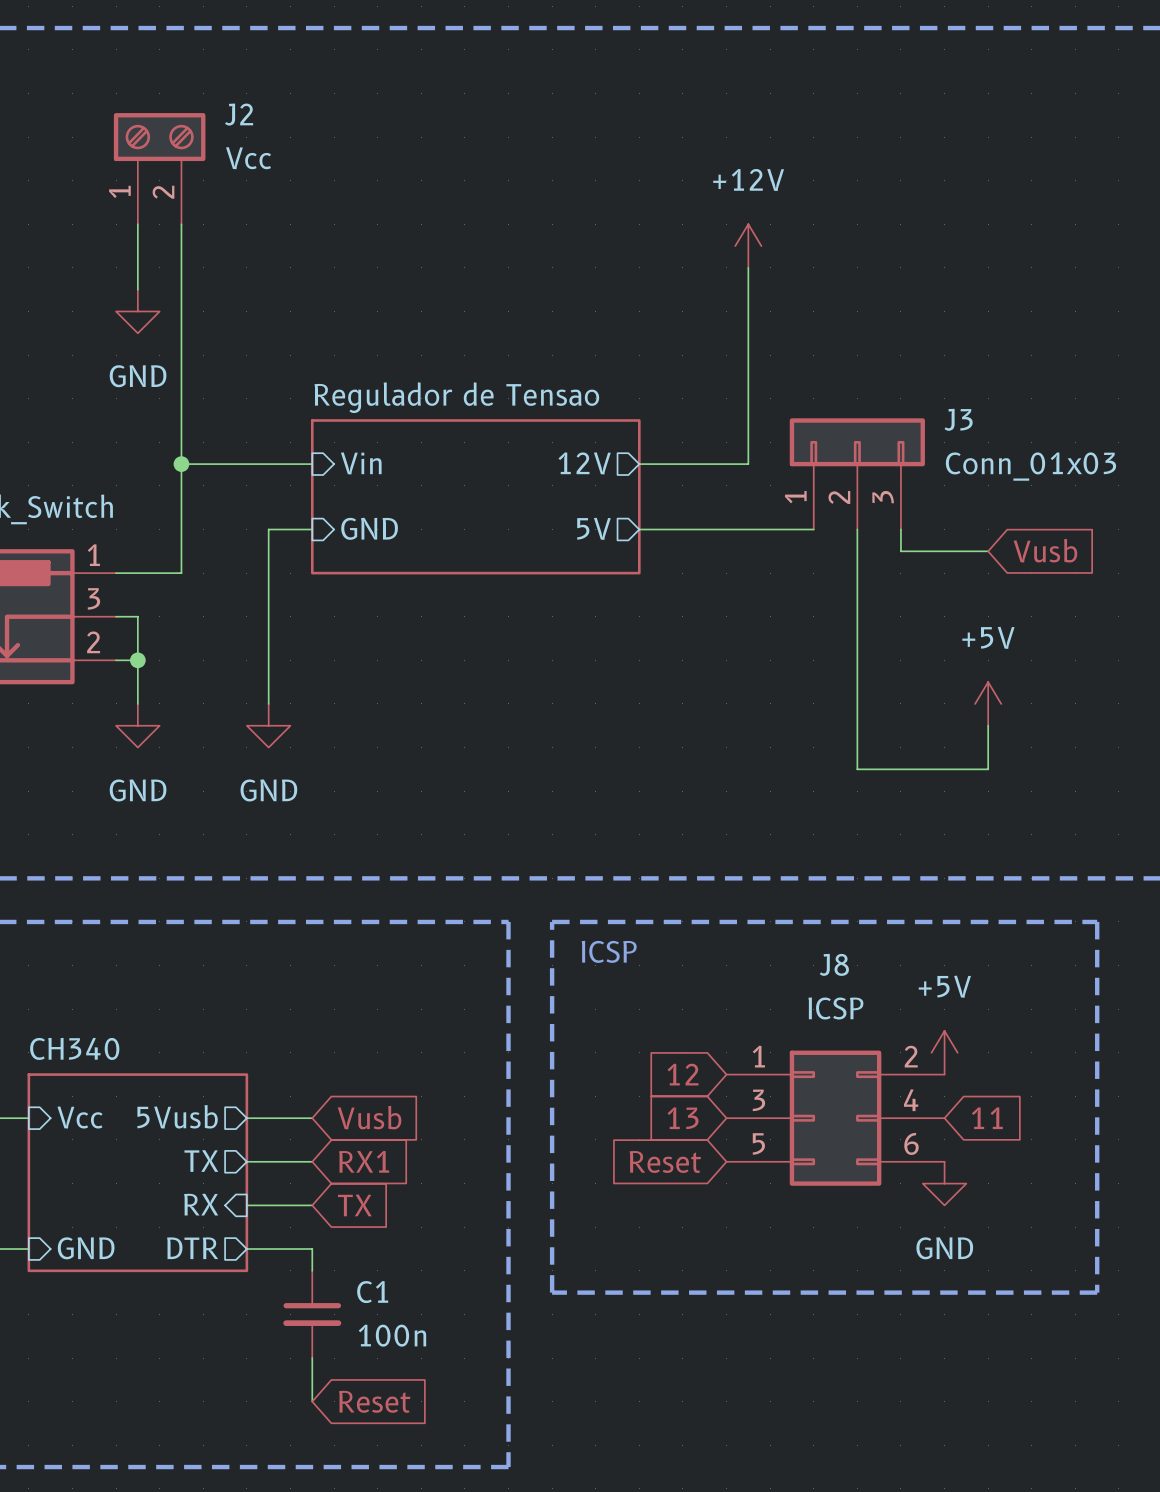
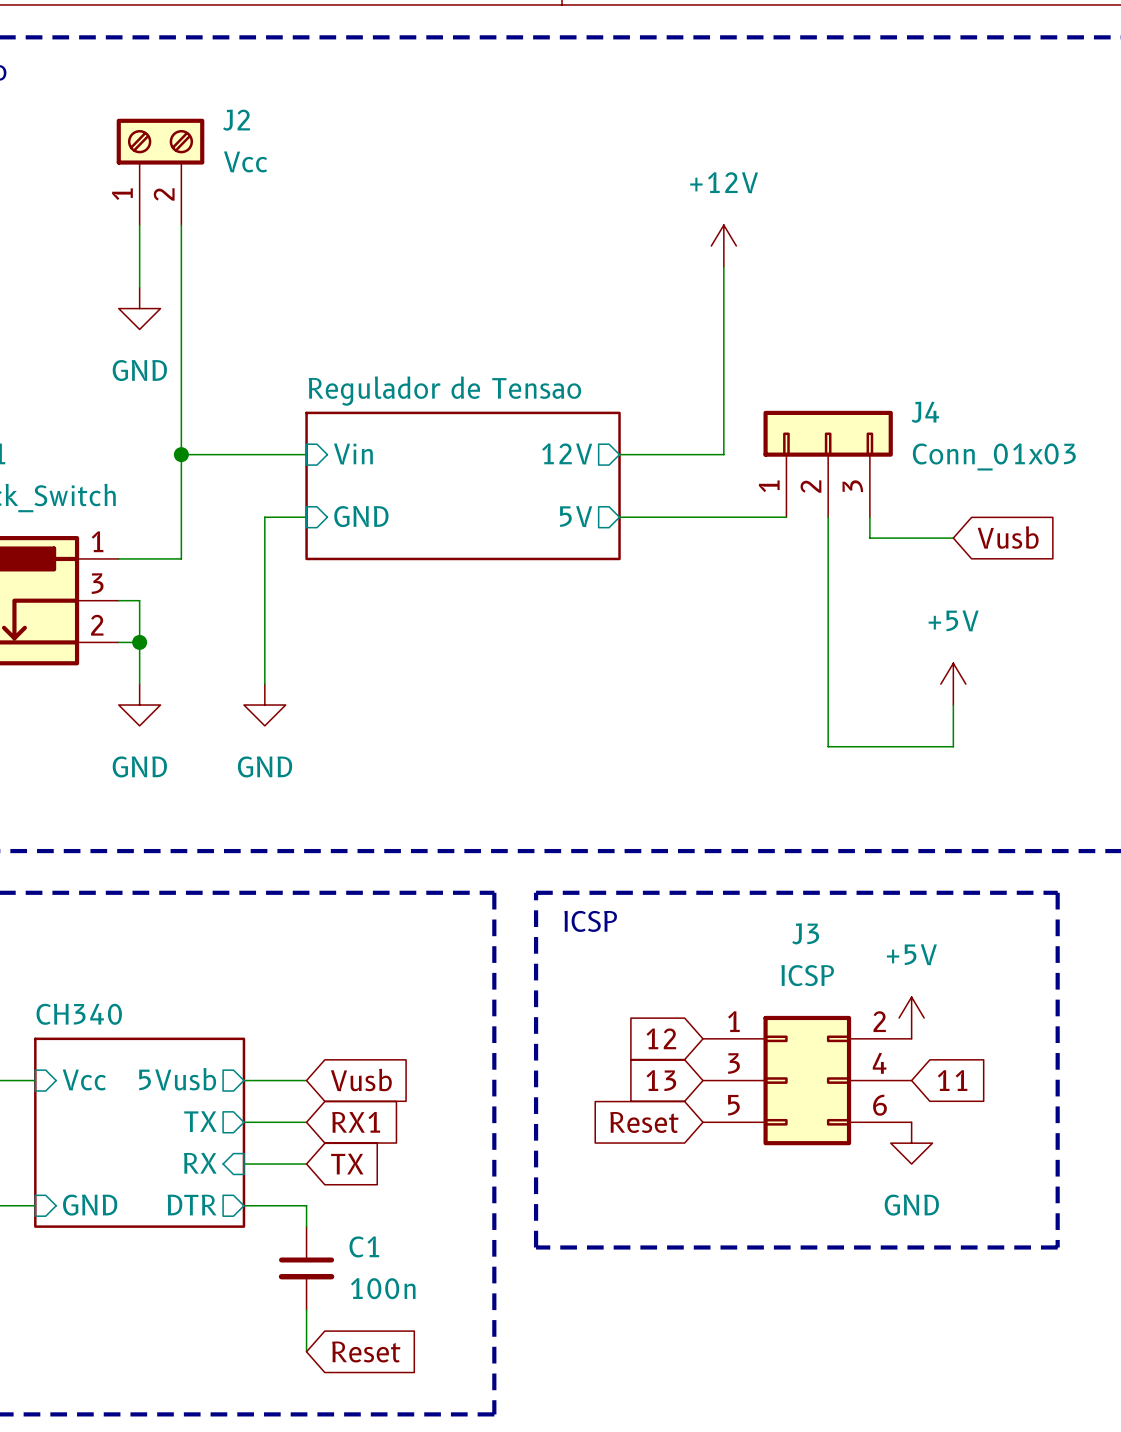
J3 name: J3 (958, 419) -> J4 (925, 412)
J8 name: J8 (834, 964) -> J3 (805, 933)

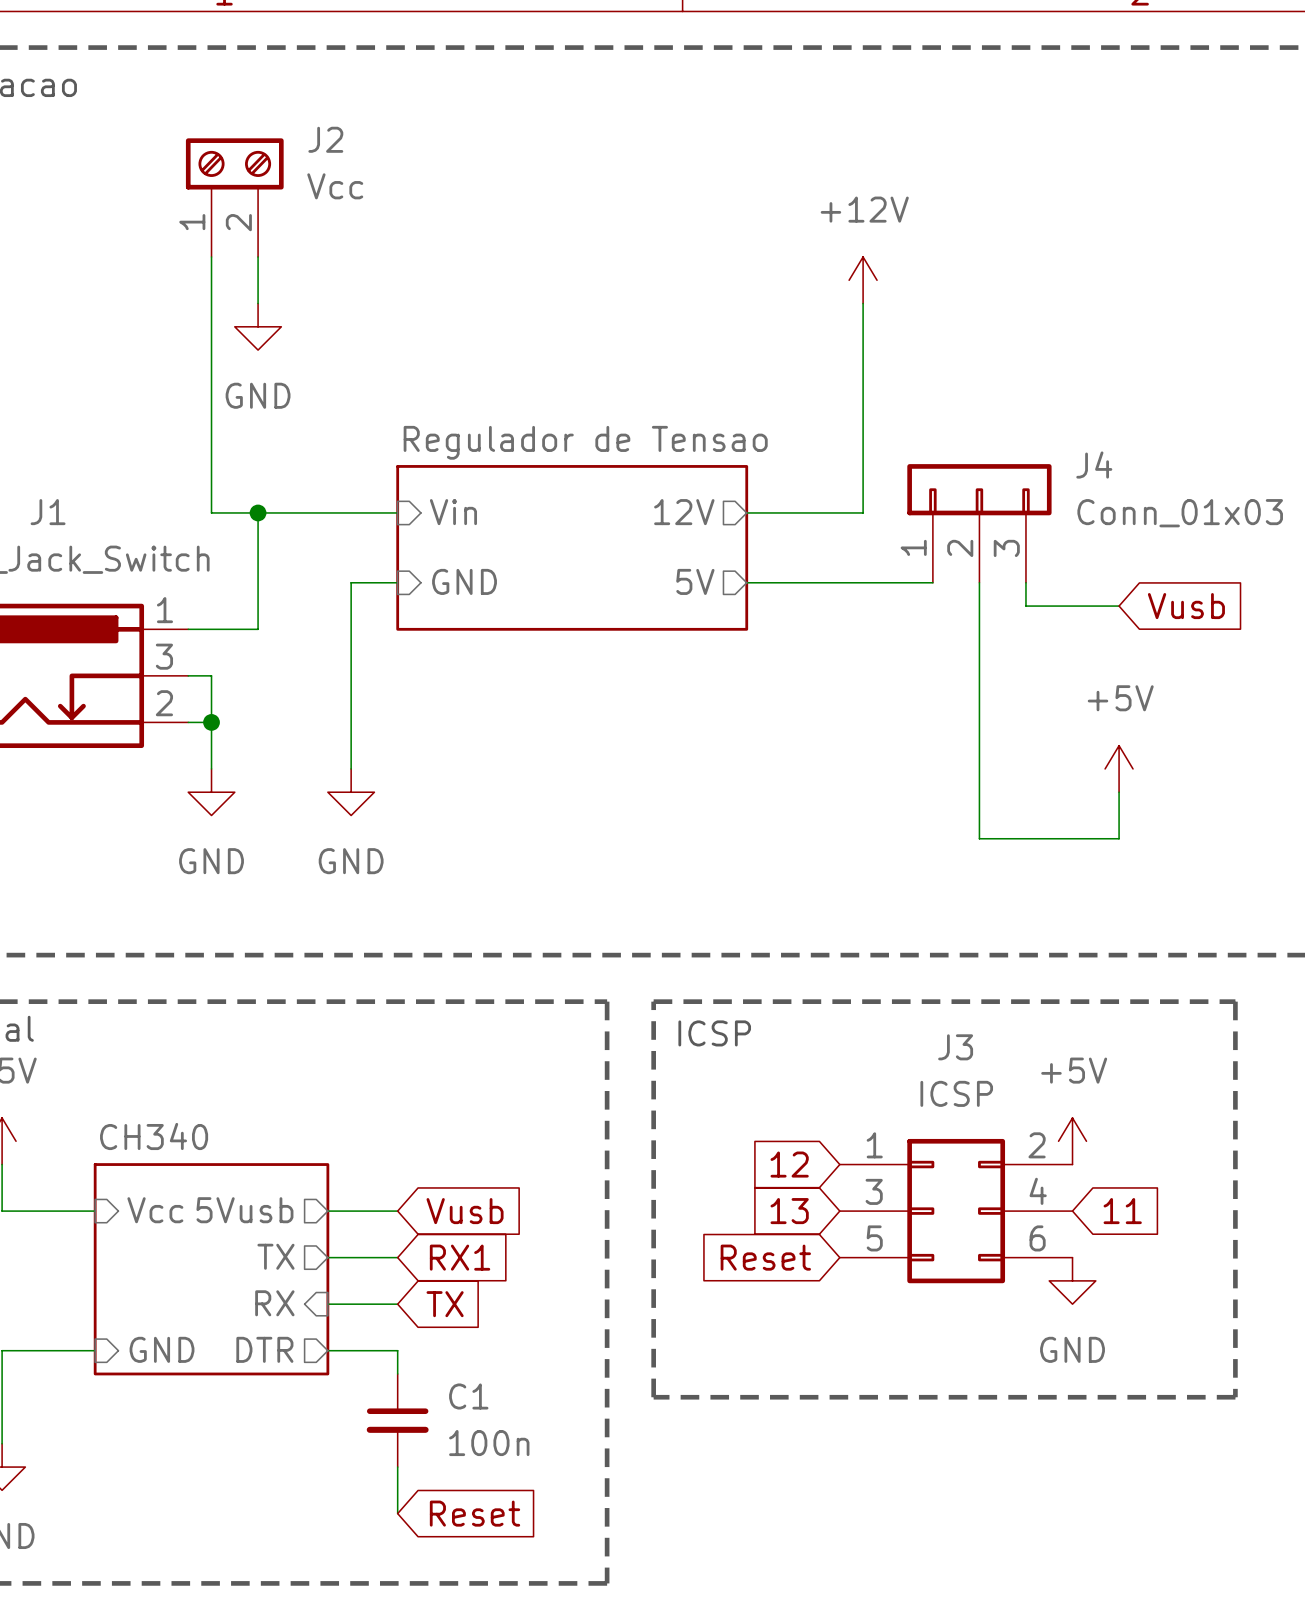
wire: (181, 266) (181, 454) -> (211, 326) (211, 512) (258, 512)
power symbol position: GND (139, 308) -> GND (258, 326)

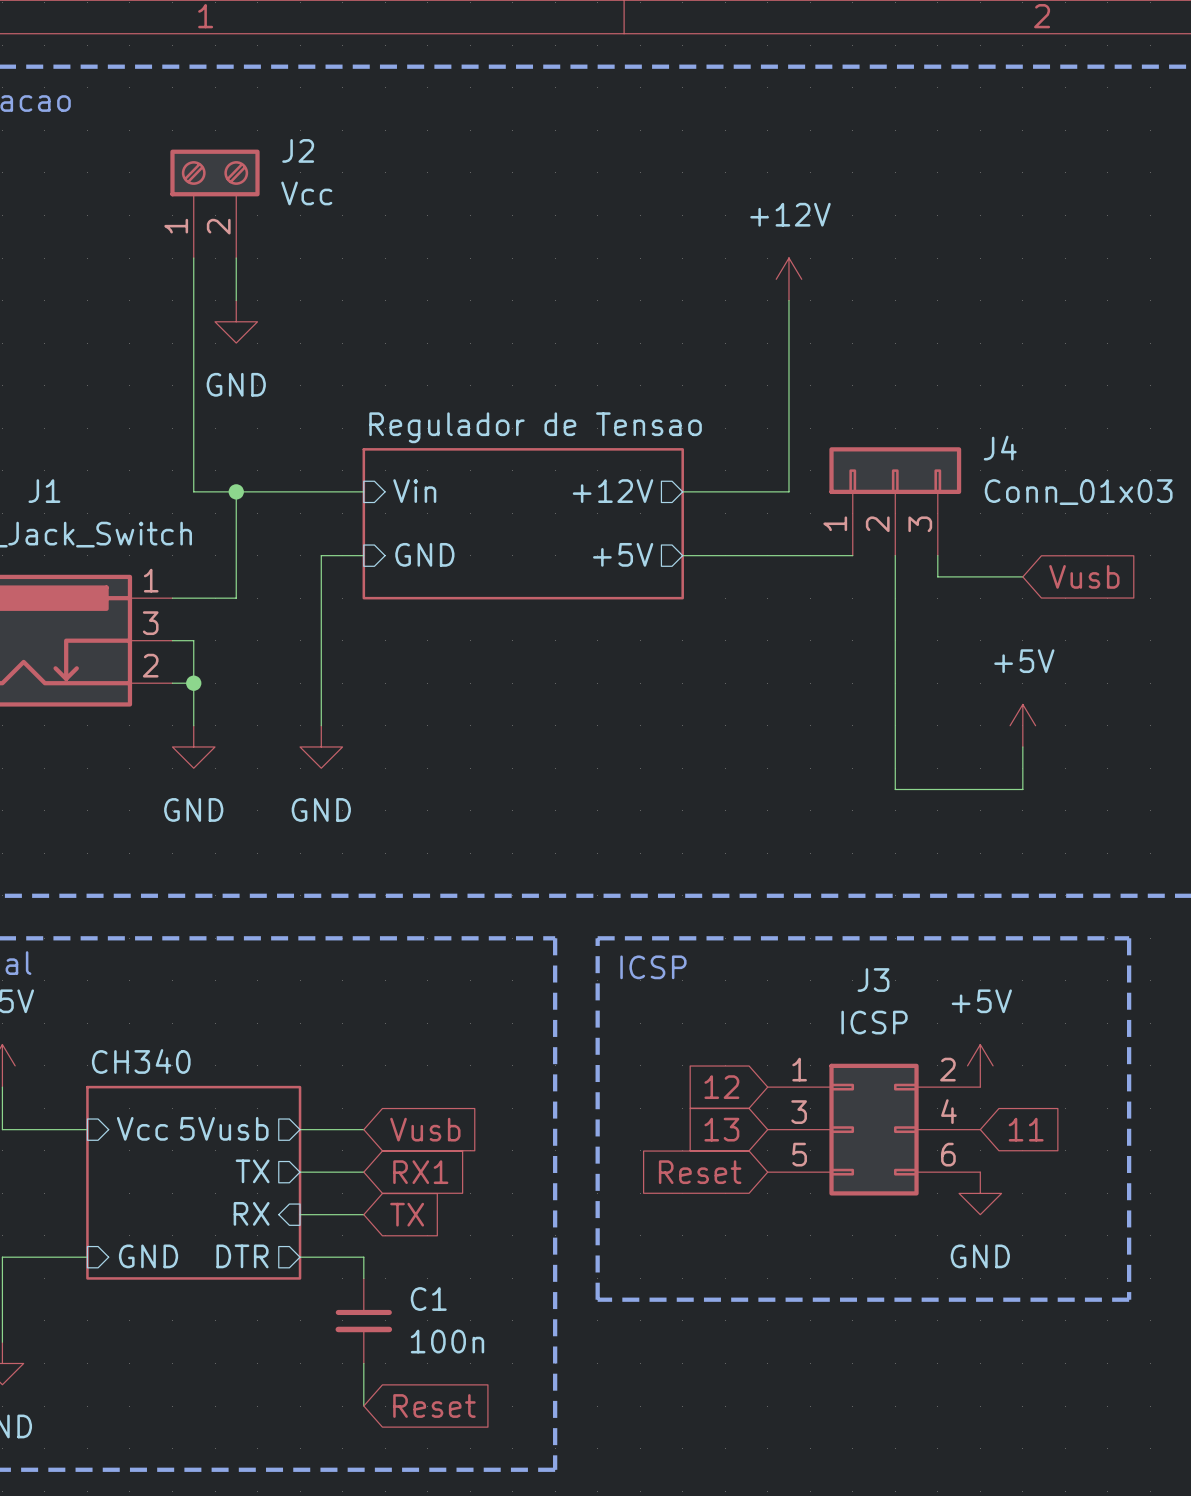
sheet pin: 12V (684, 512) -> +12V (613, 491)
sheet pin: 5V (695, 581) -> +5V (623, 554)

